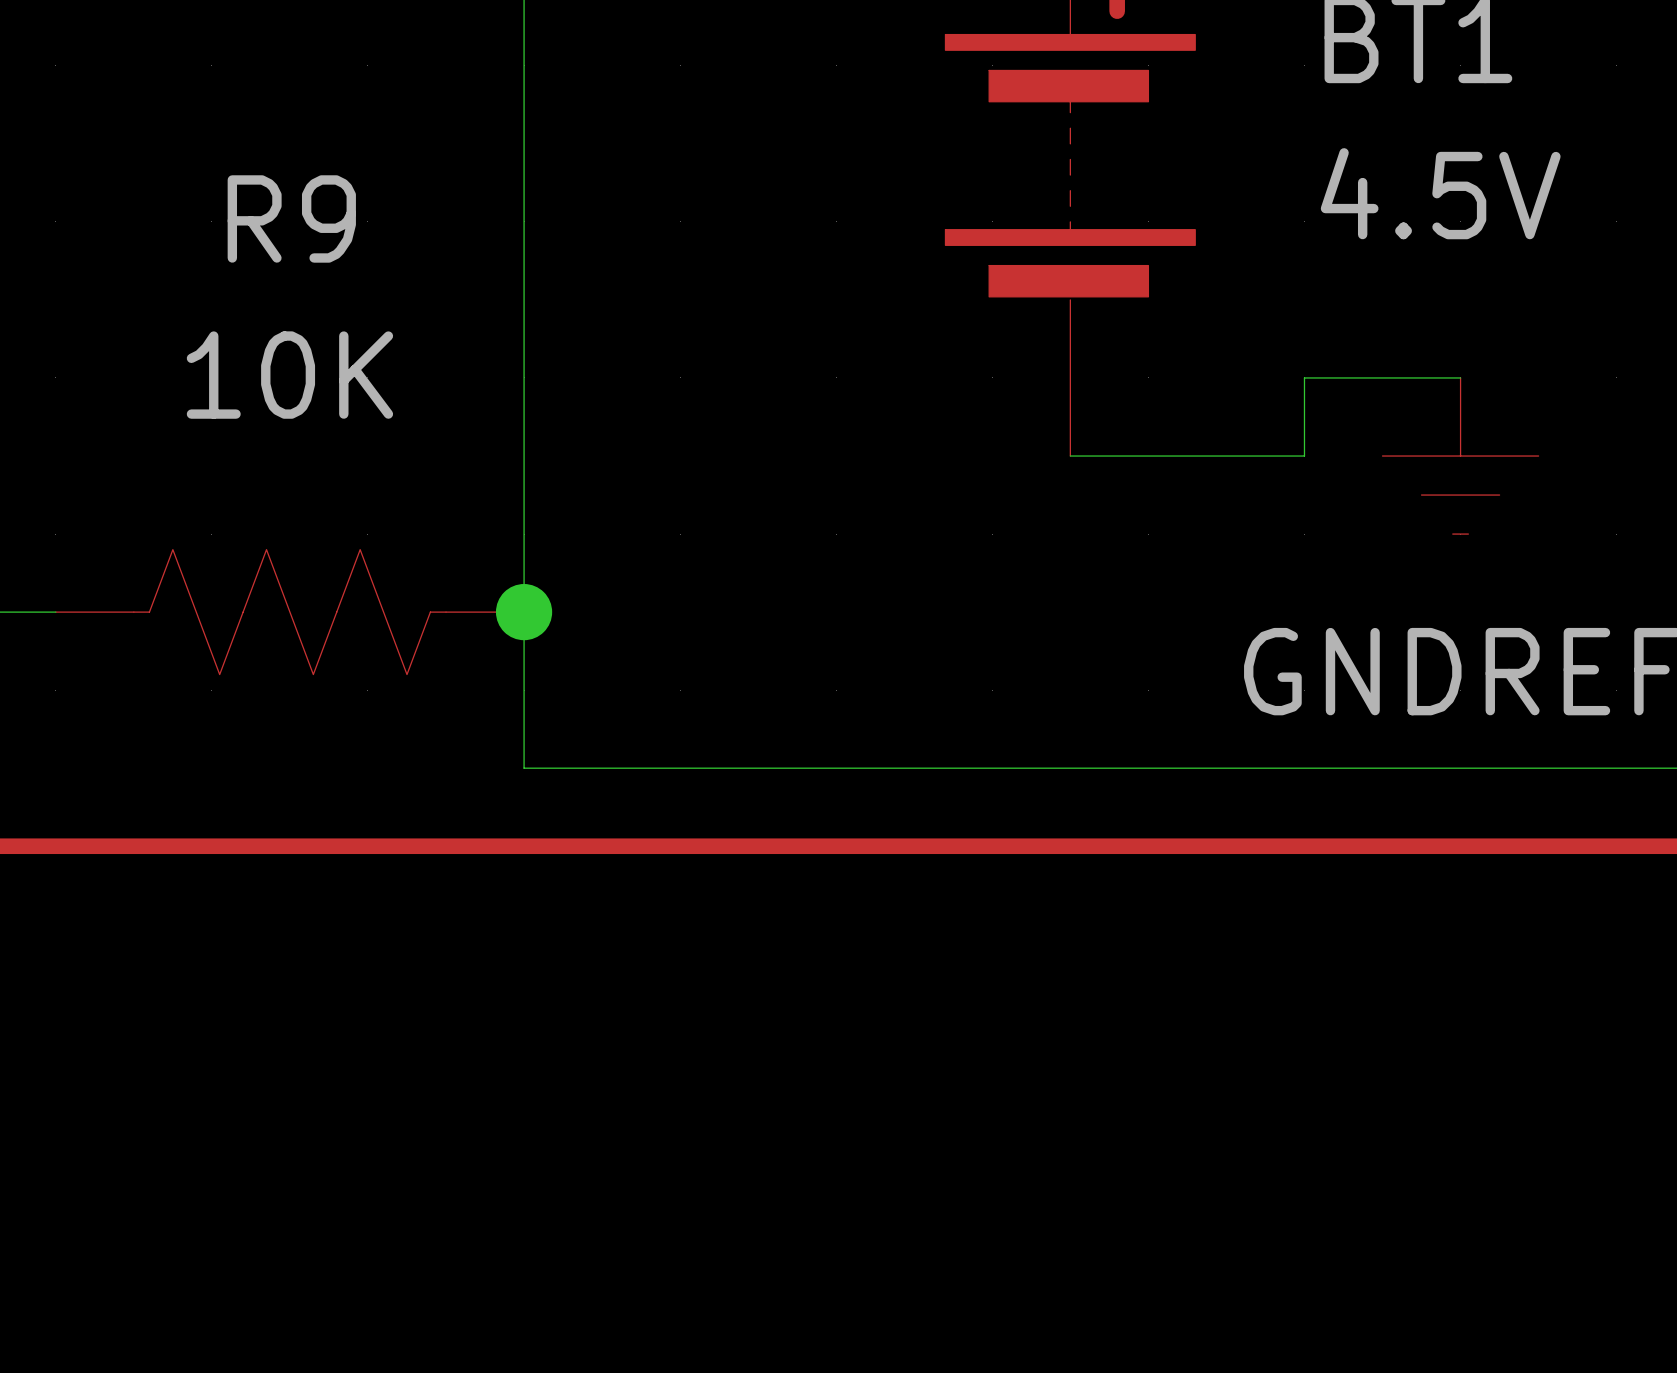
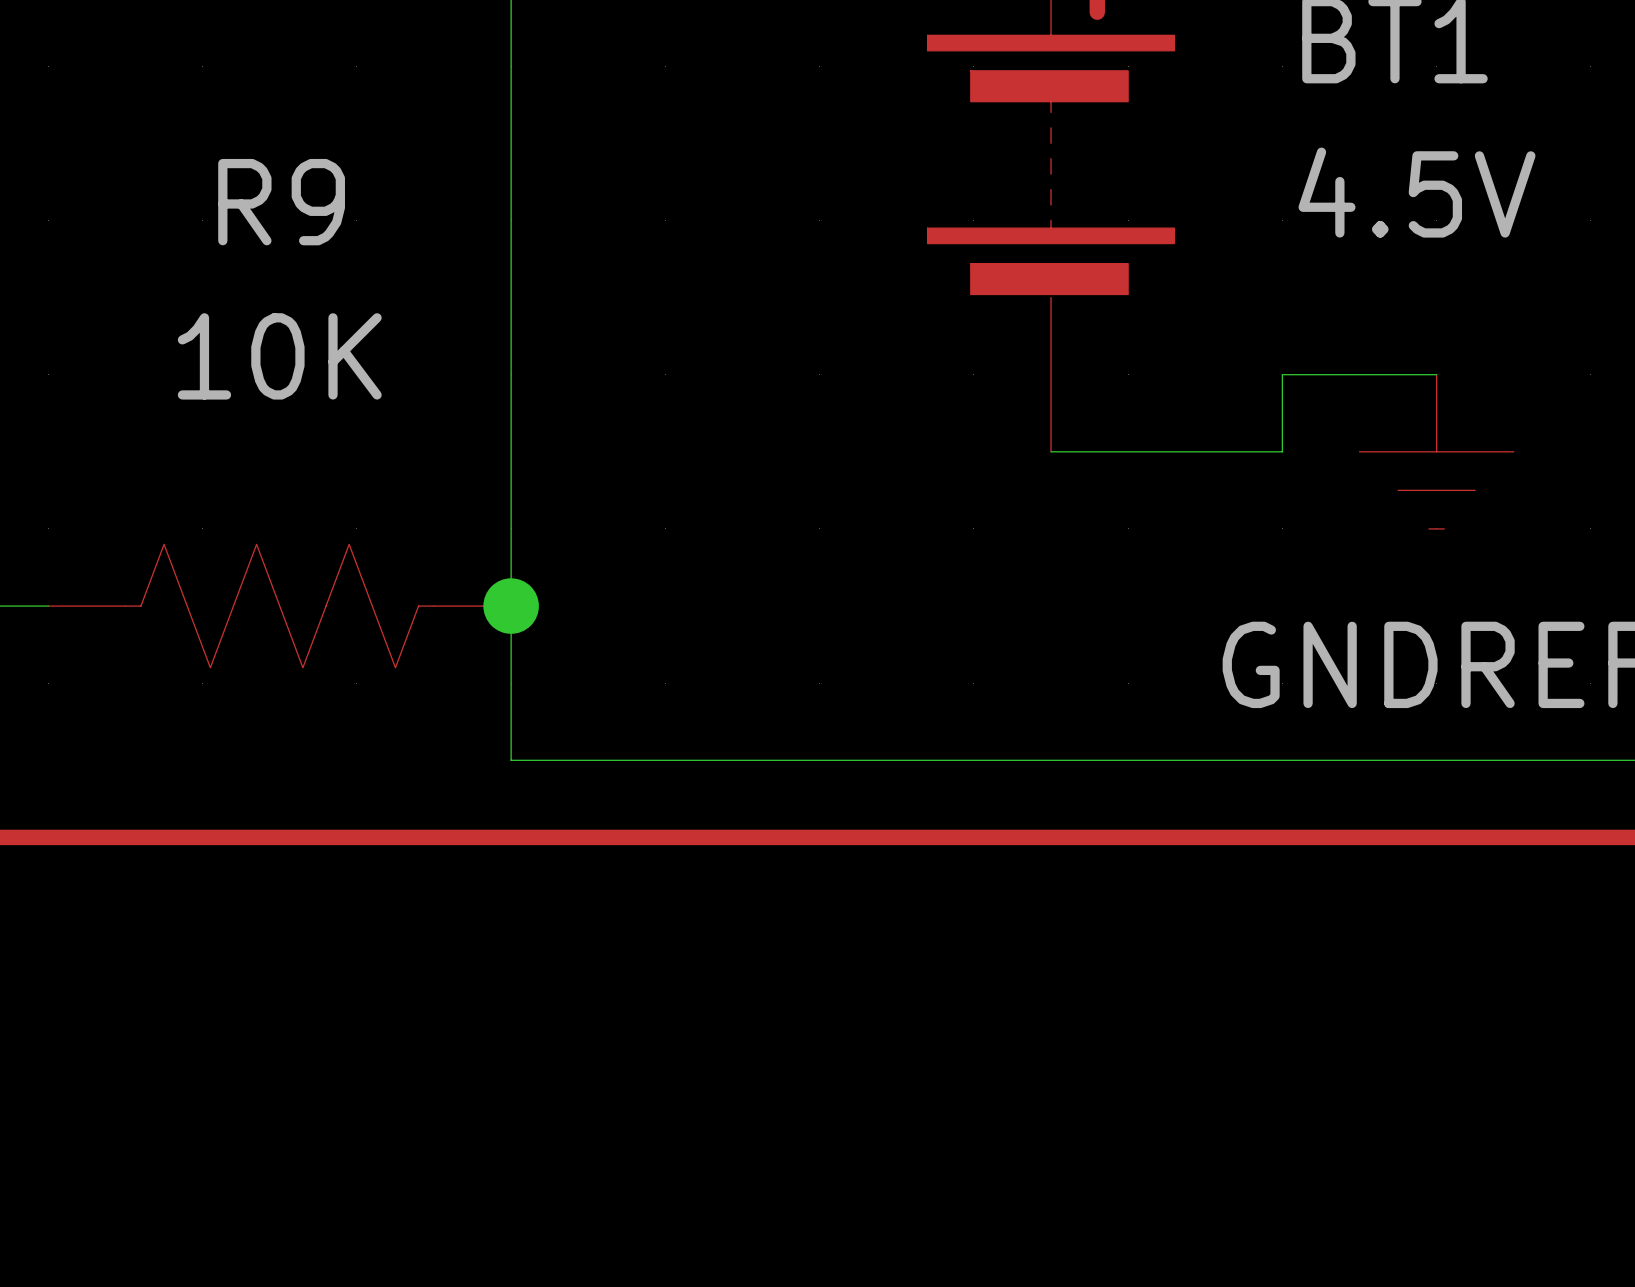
R9 name position: R9 (291, 218) -> R9 (281, 202)
R9 value position: 10K (289, 375) -> 10K (279, 356)

